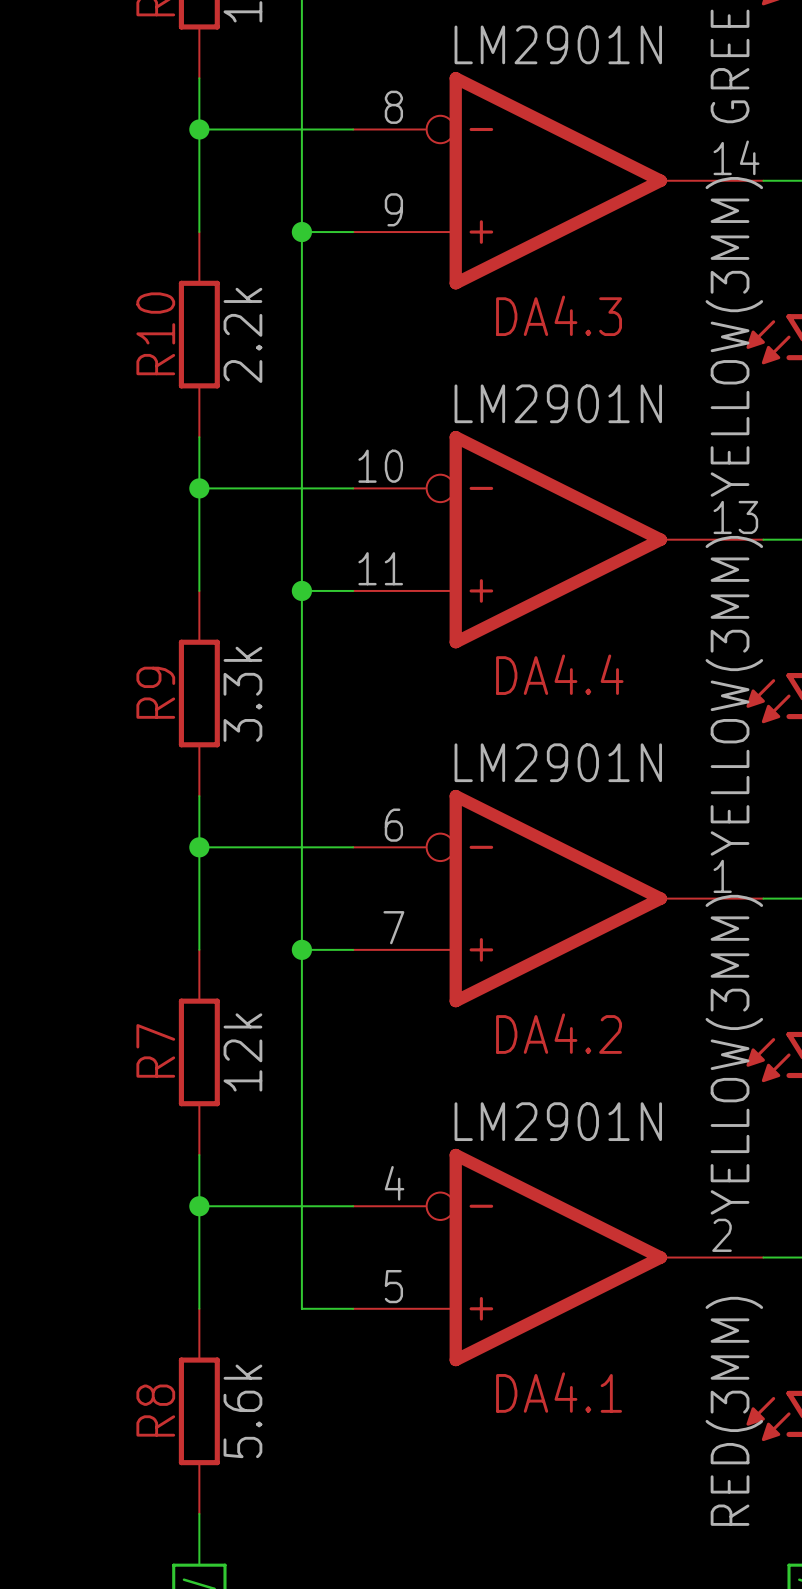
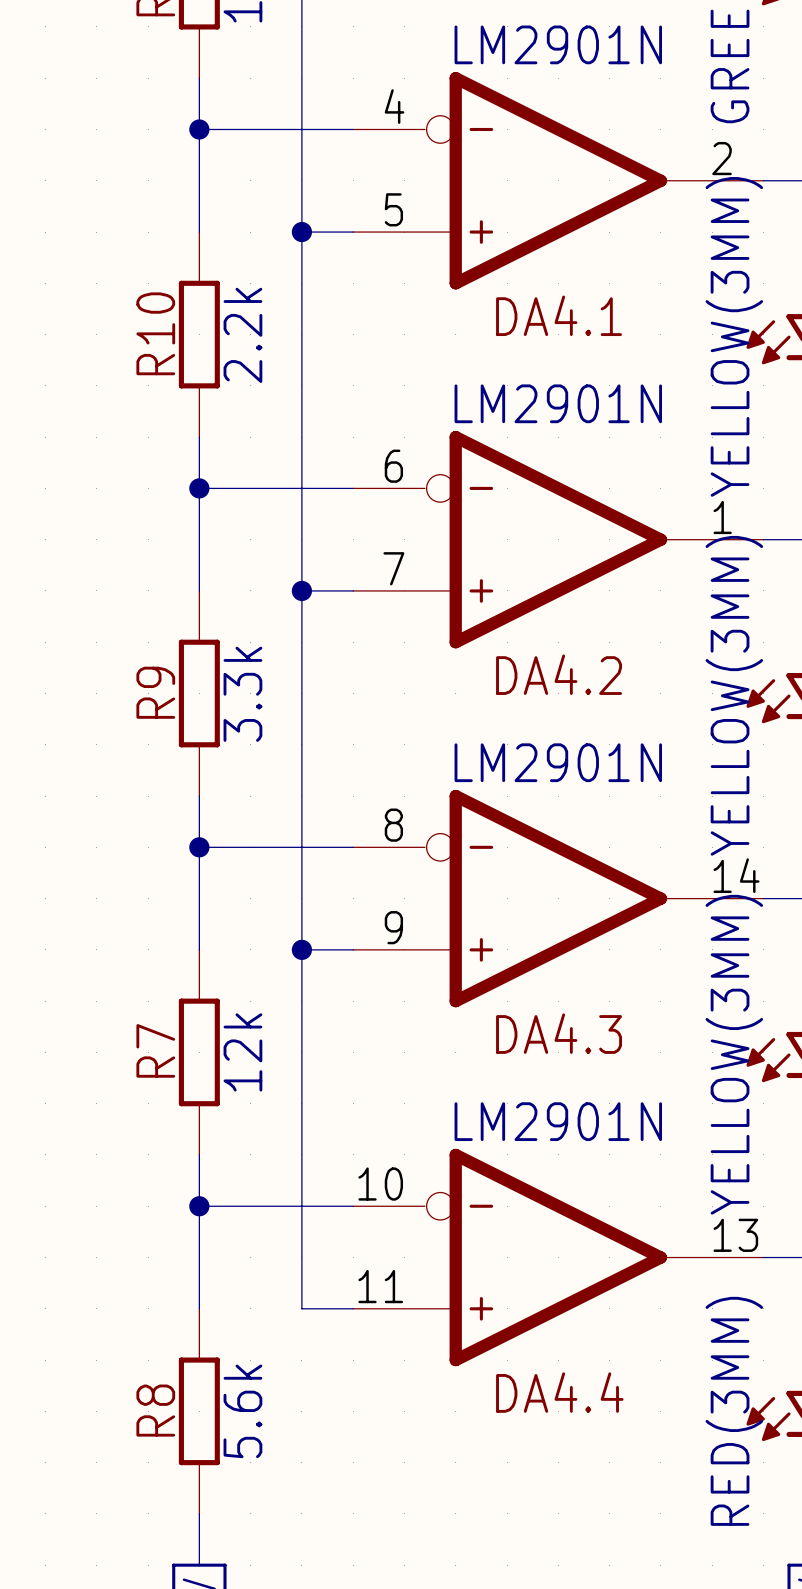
DA4.3 position: (558, 180) -> (558, 898)
DA4.4 position: (558, 539) -> (558, 1257)
DA4.2 position: (558, 898) -> (558, 539)
DA4.1 position: (558, 1257) -> (558, 180)

